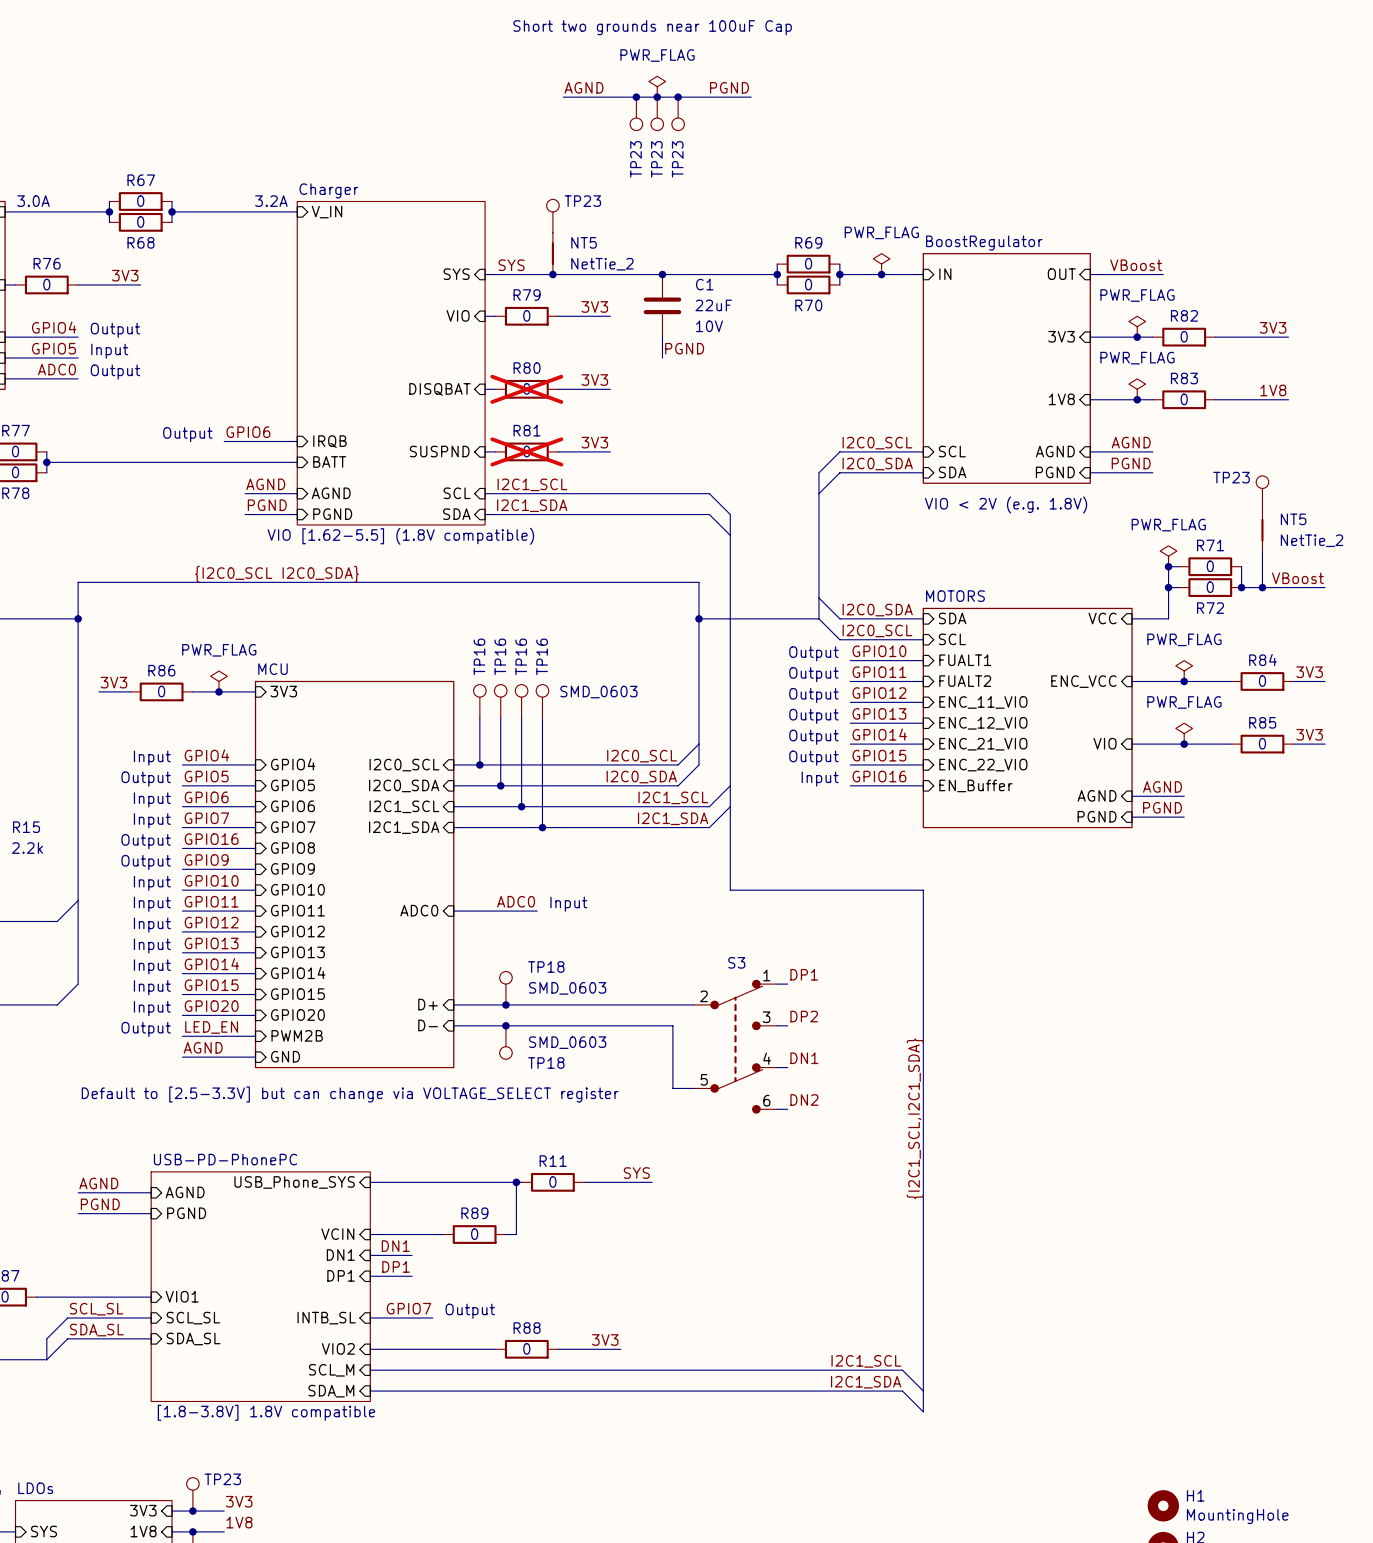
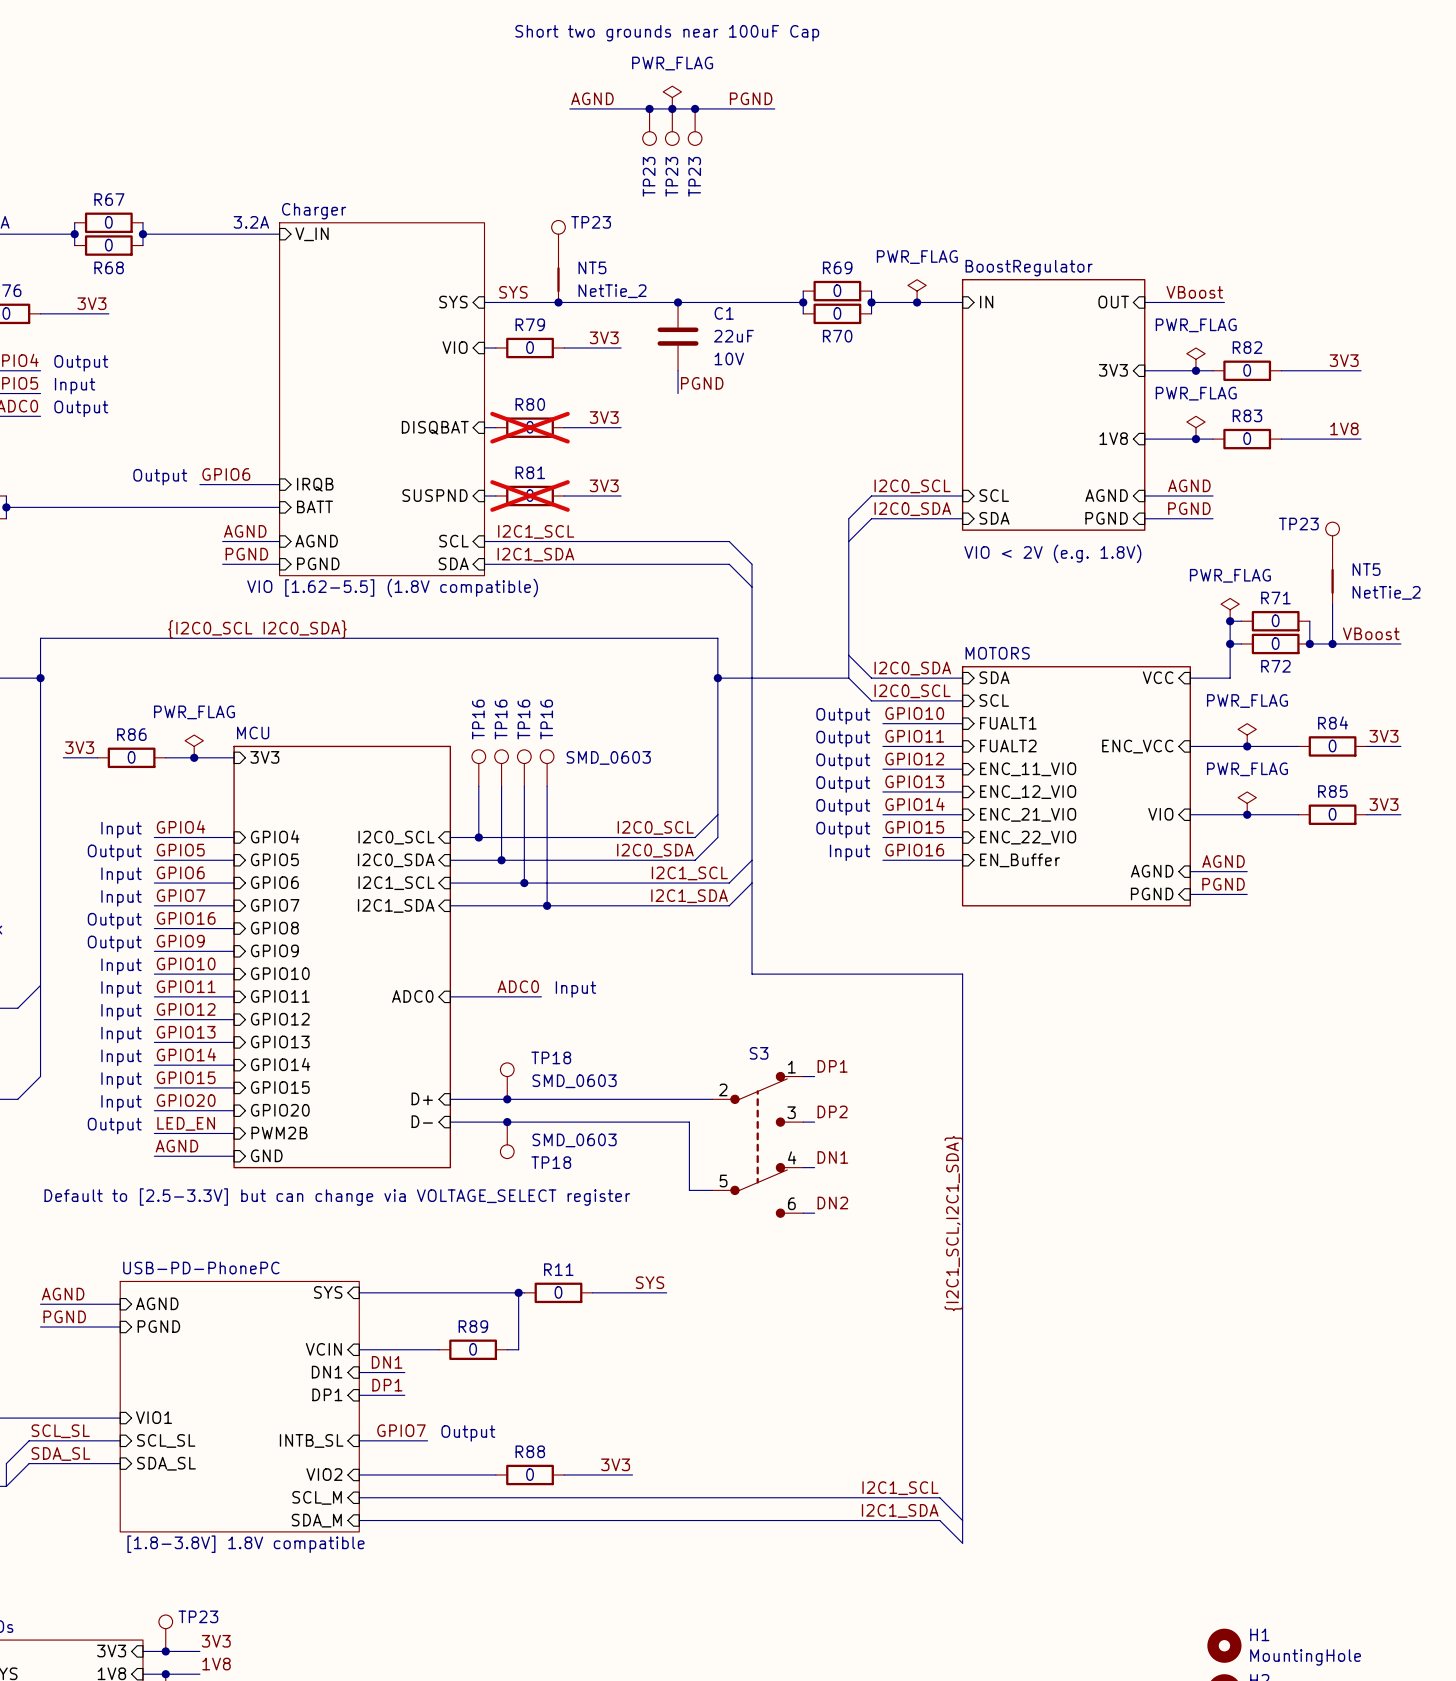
sheet pin: USB_Phone_SYS (294, 1182) -> SYS (328, 1292)

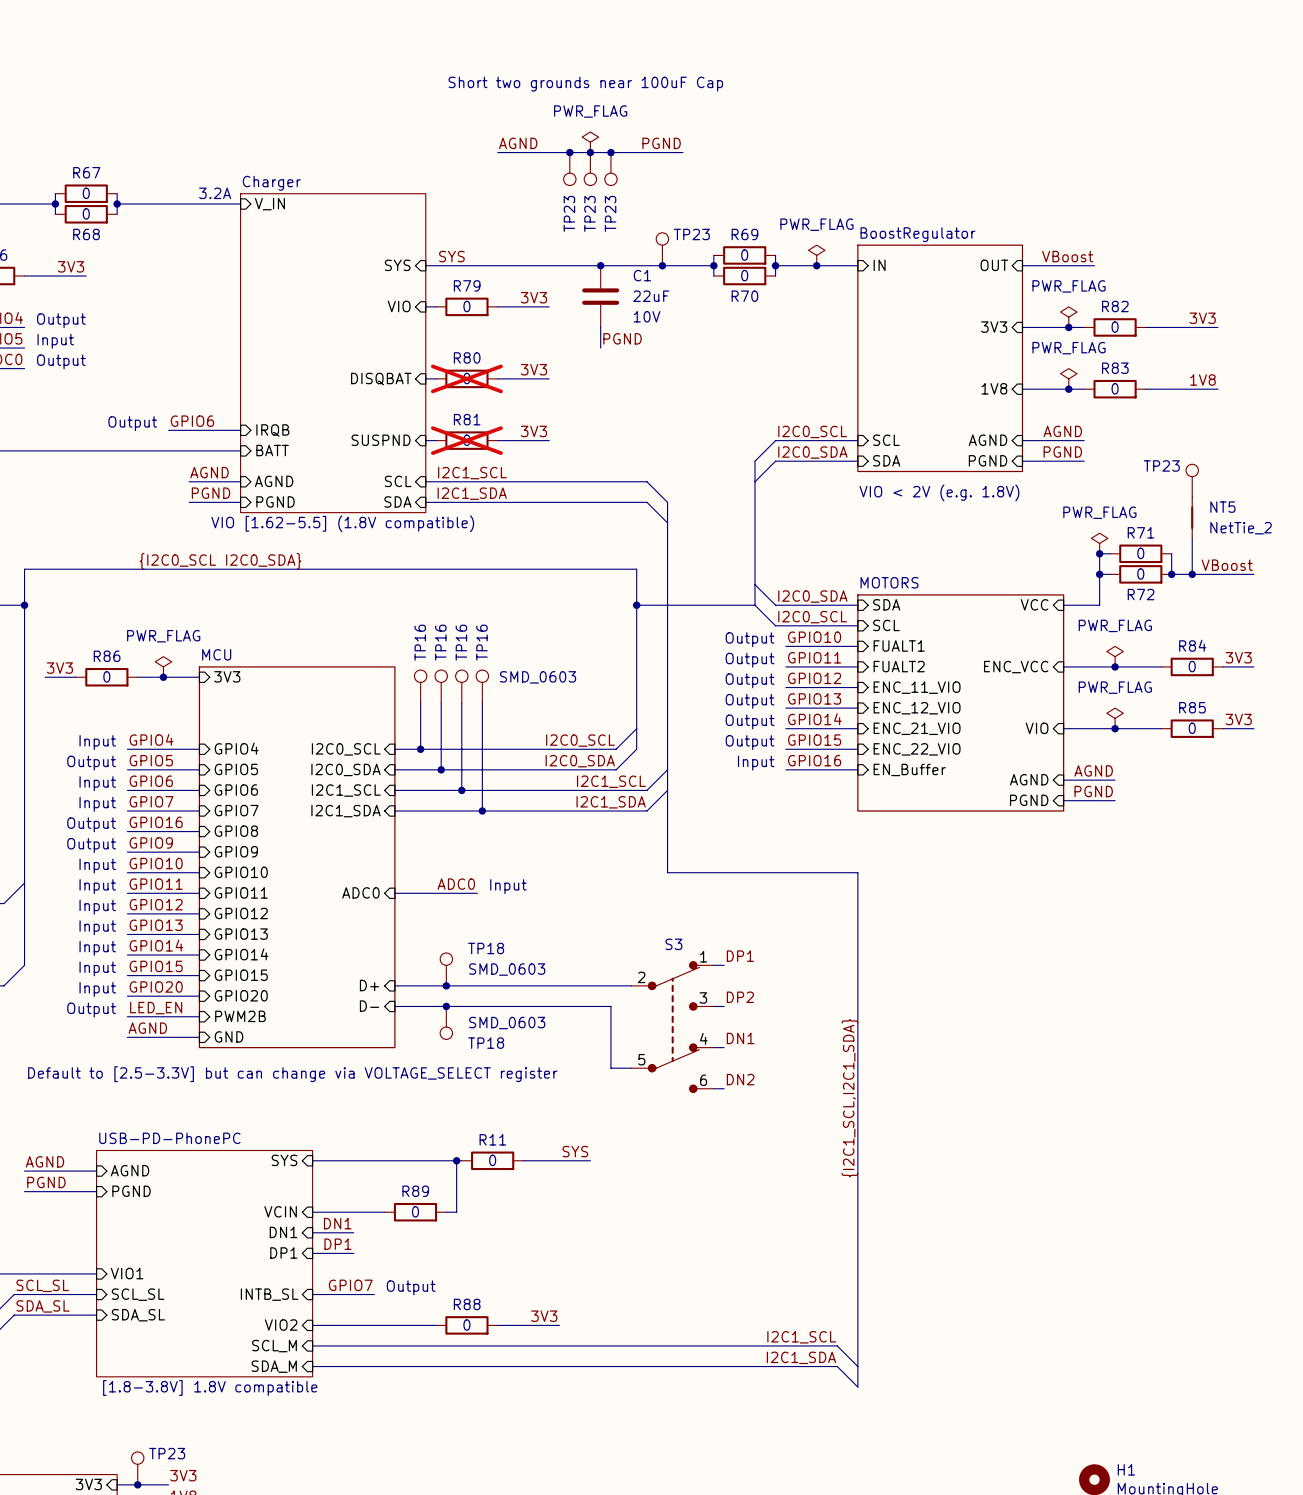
text position: Short two grounds near 100uF Cap (667, 33) -> Short two grounds near 100uF Cap (585, 84)
power symbol position: PWR_FLAG (672, 97) -> PWR_FLAG (590, 142)
label position: AGND (592, 98) -> AGND (518, 143)
label position: PGND (751, 98) -> PGND (661, 143)
wire: (569, 108) (774, 108) -> (497, 152) (682, 152)
junction: (649, 108) -> none
junction: (672, 108) -> none
junction: (695, 108) -> none
TP23: (649, 127) -> none
TP23: (672, 127) -> none
TP23: (695, 127) -> none
junction: none -> (569, 152)
junction: none -> (590, 152)
junction: none -> (610, 152)
TP23: none -> (569, 169)
TP23: none -> (590, 169)
TP23: none -> (610, 169)
TP23: (558, 238) -> none
NT5: NetTie_2 (558, 279) -> none
TP23: none -> (662, 249)
junction: (558, 302) -> none
junction: none -> (662, 265)

